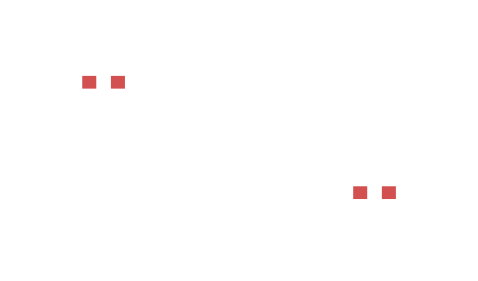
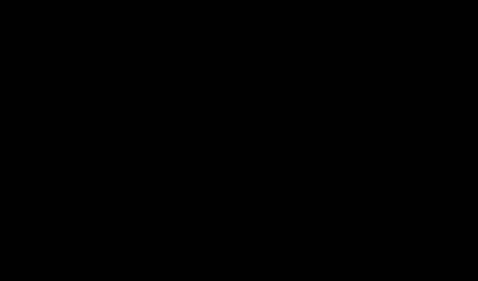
part: (103, 82) -> none
part: (374, 192) -> none

